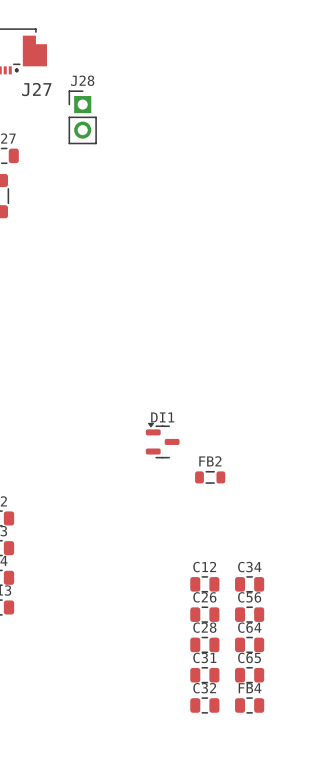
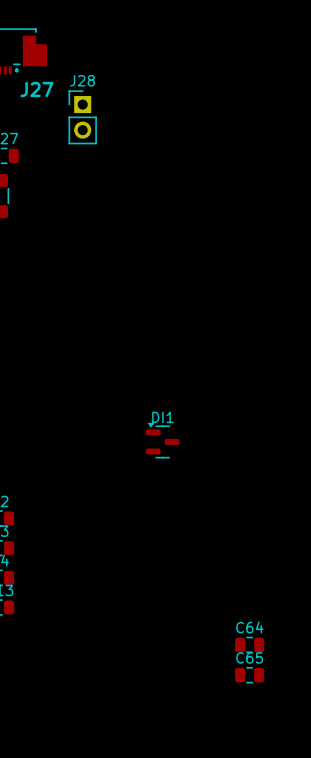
FB2: (210, 477) -> none
C12: (204, 584) -> none
C34: (249, 584) -> none
C26: (204, 614) -> none
C56: (249, 614) -> none
C28: (204, 644) -> none
C31: (204, 675) -> none
C32: (204, 705) -> none
FB4: (249, 705) -> none

